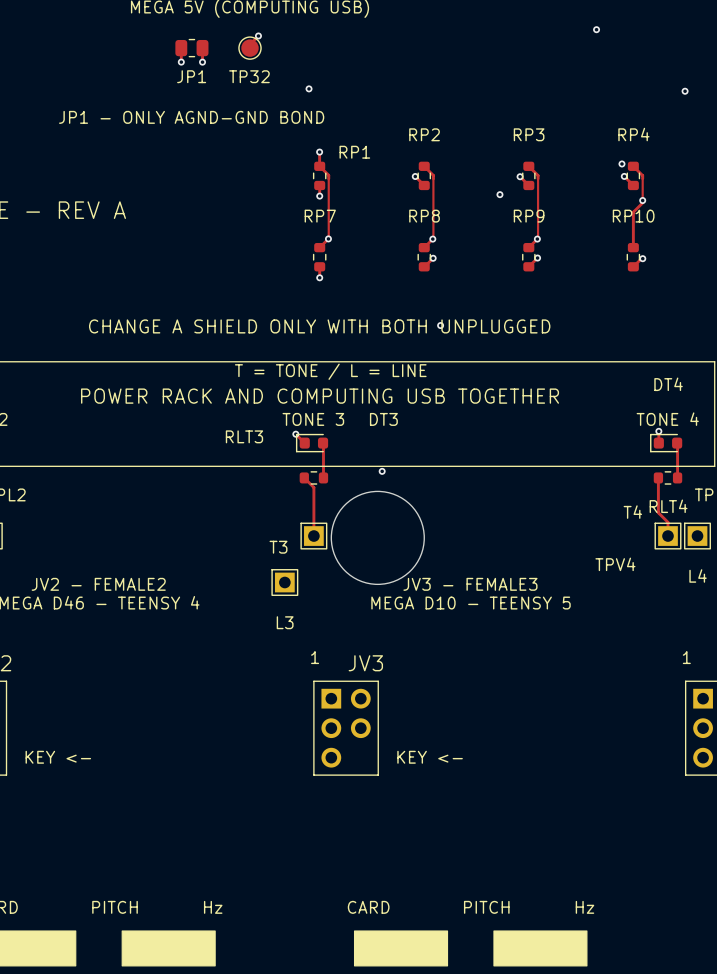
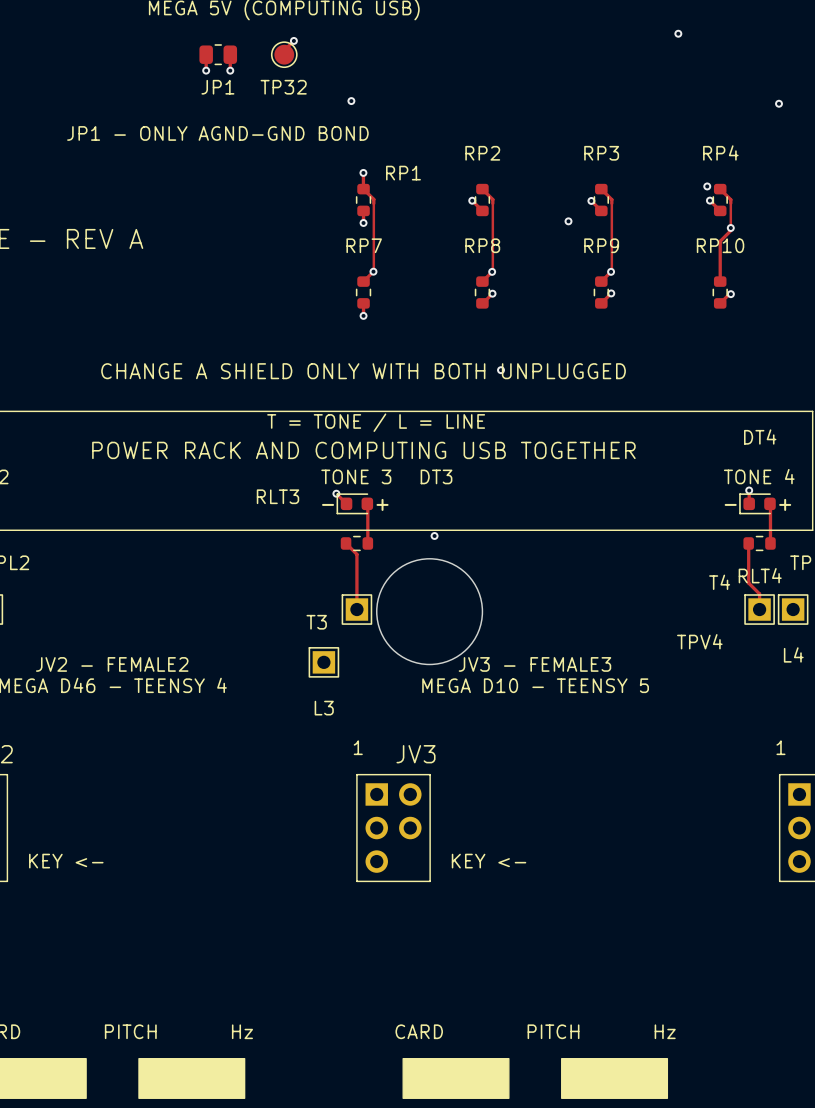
DT3 text: none -> - (328, 504)
DT3 text: none -> + (382, 504)
DT4 text: none -> - (730, 504)
DT4 text: none -> + (785, 504)

